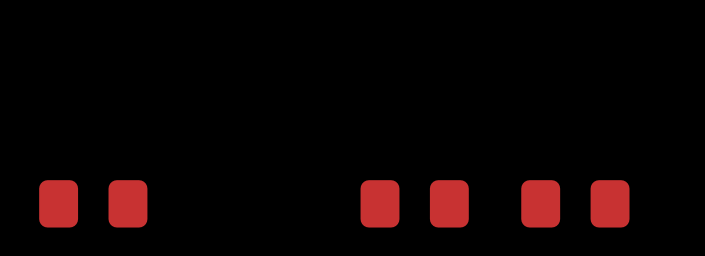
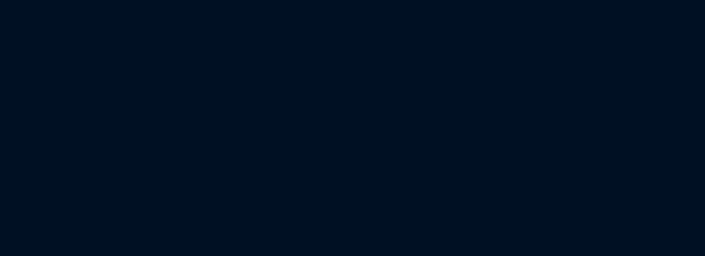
part: (93, 203) -> none
part: (414, 203) -> none
part: (575, 203) -> none

